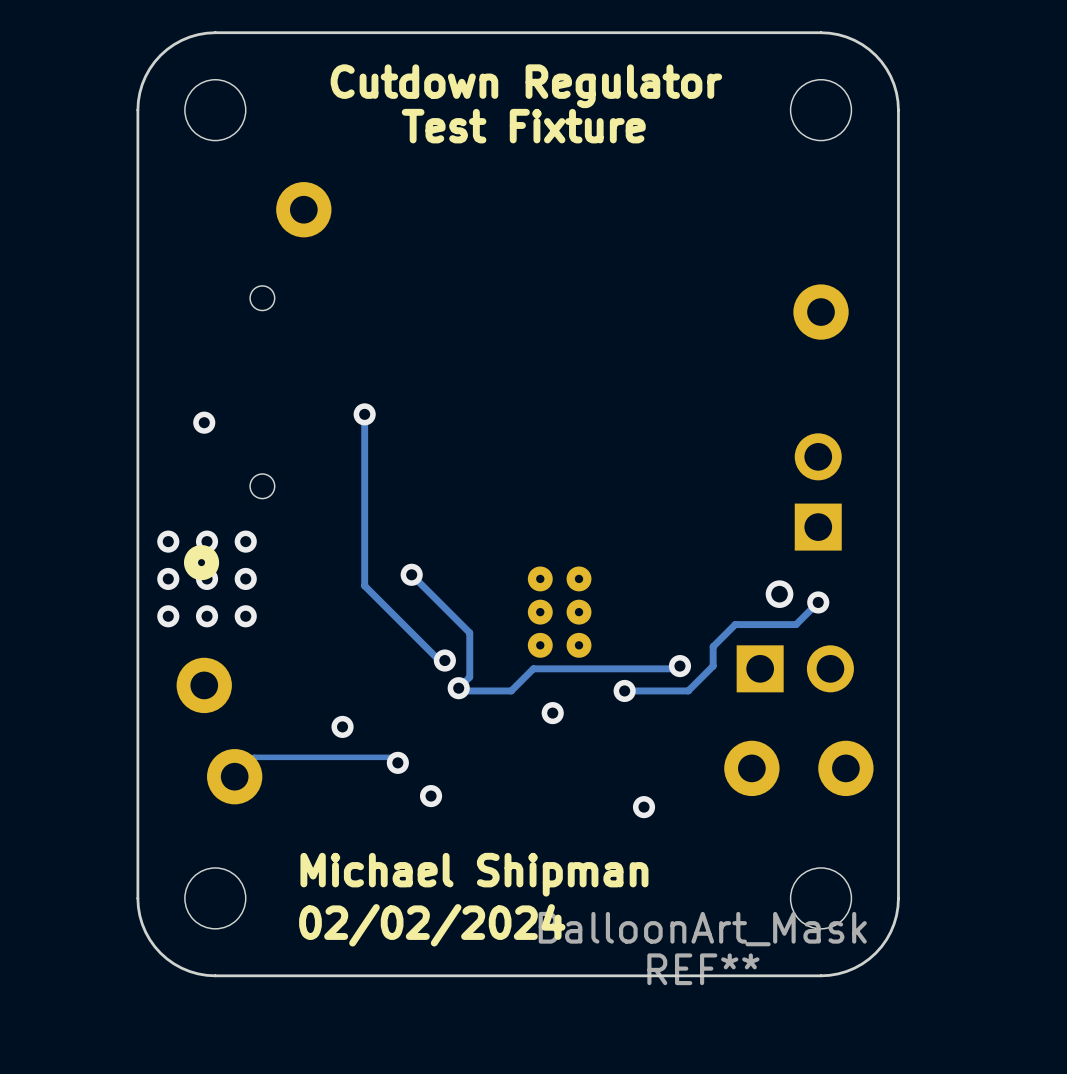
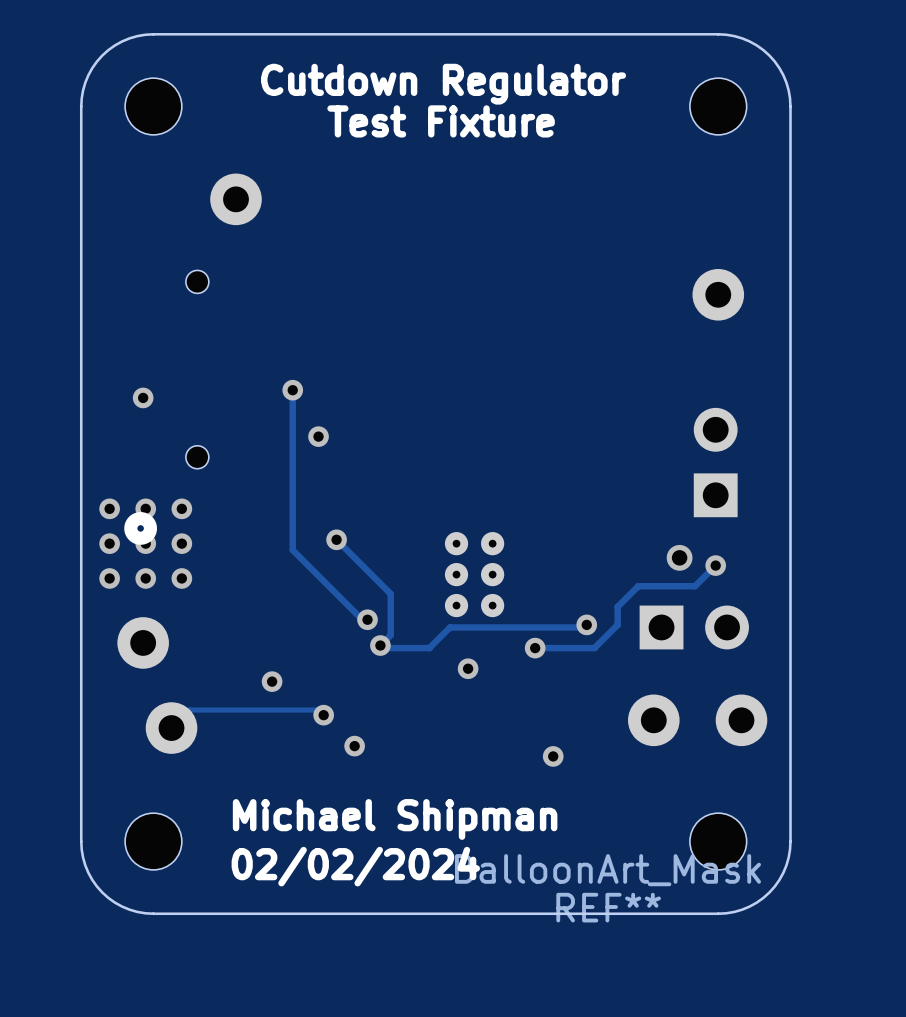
via: none -> (318, 436)

